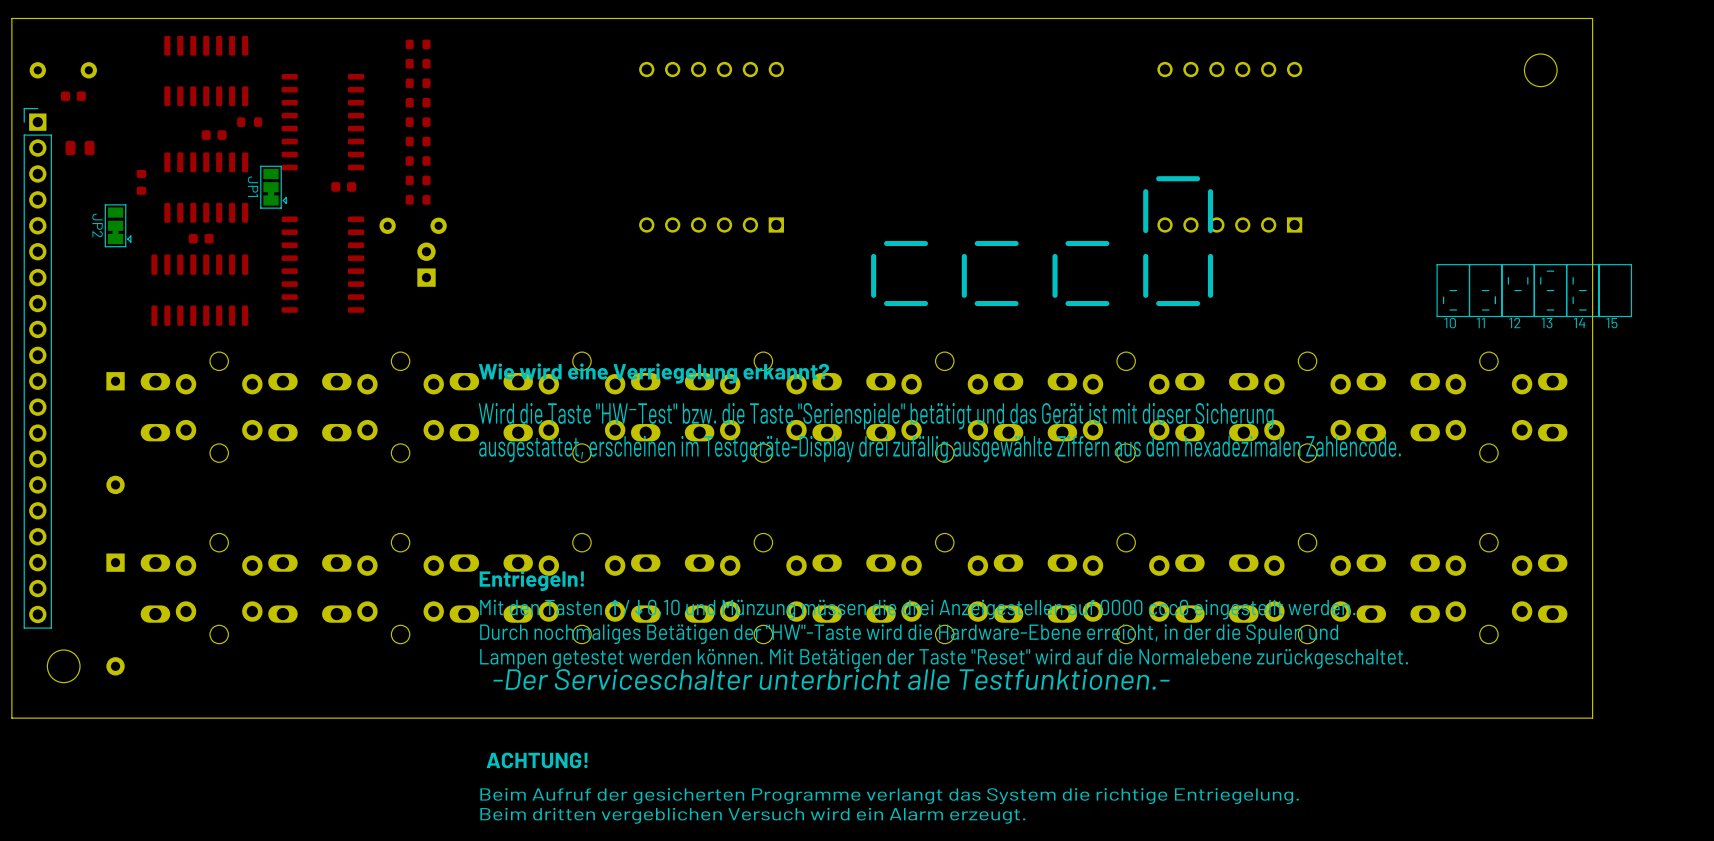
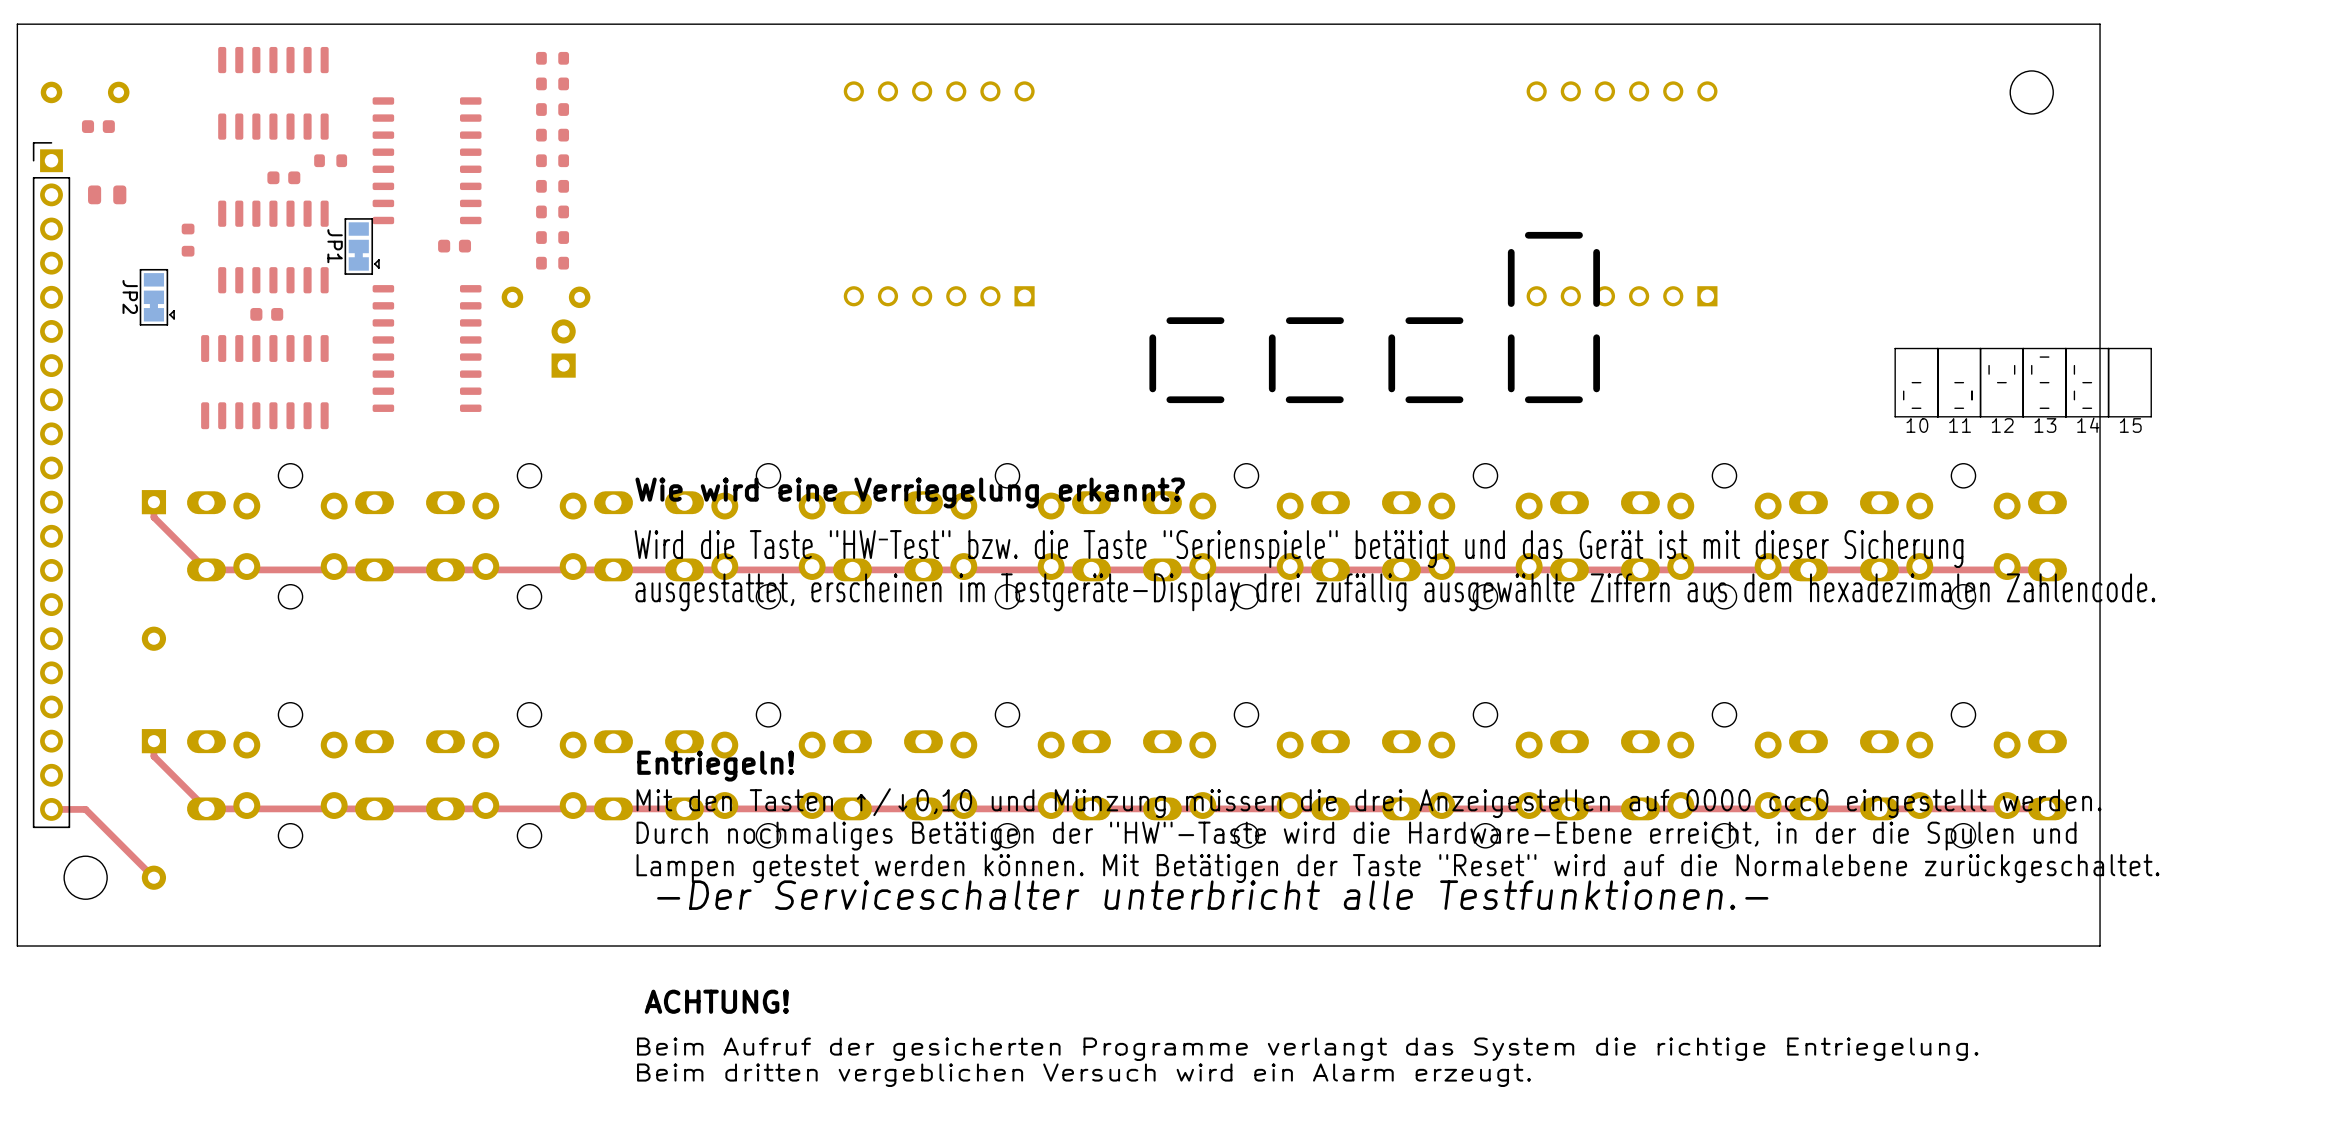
top track: none -> (153, 502) (153, 517) (206, 569) (2047, 569)
top track: none -> (153, 741) (153, 756) (206, 808) (2047, 808)
top track: none -> (51, 809) (85, 809) (153, 877)

